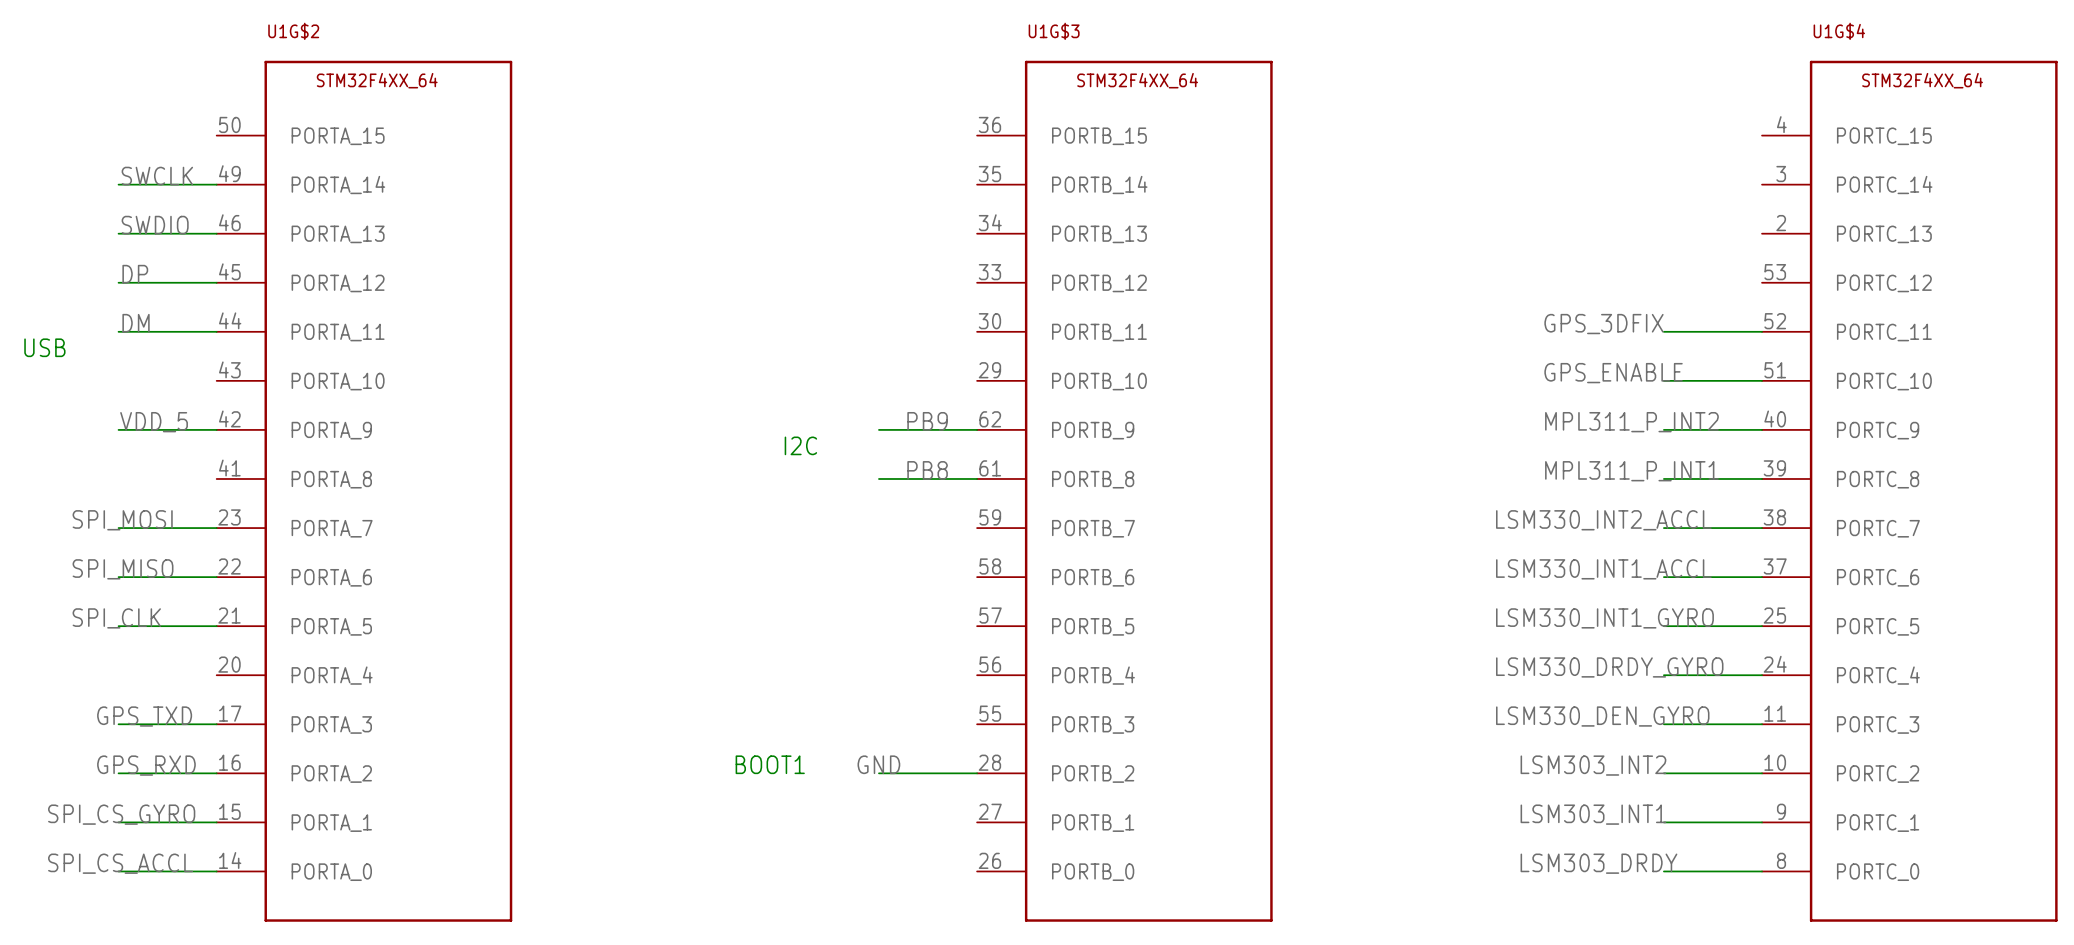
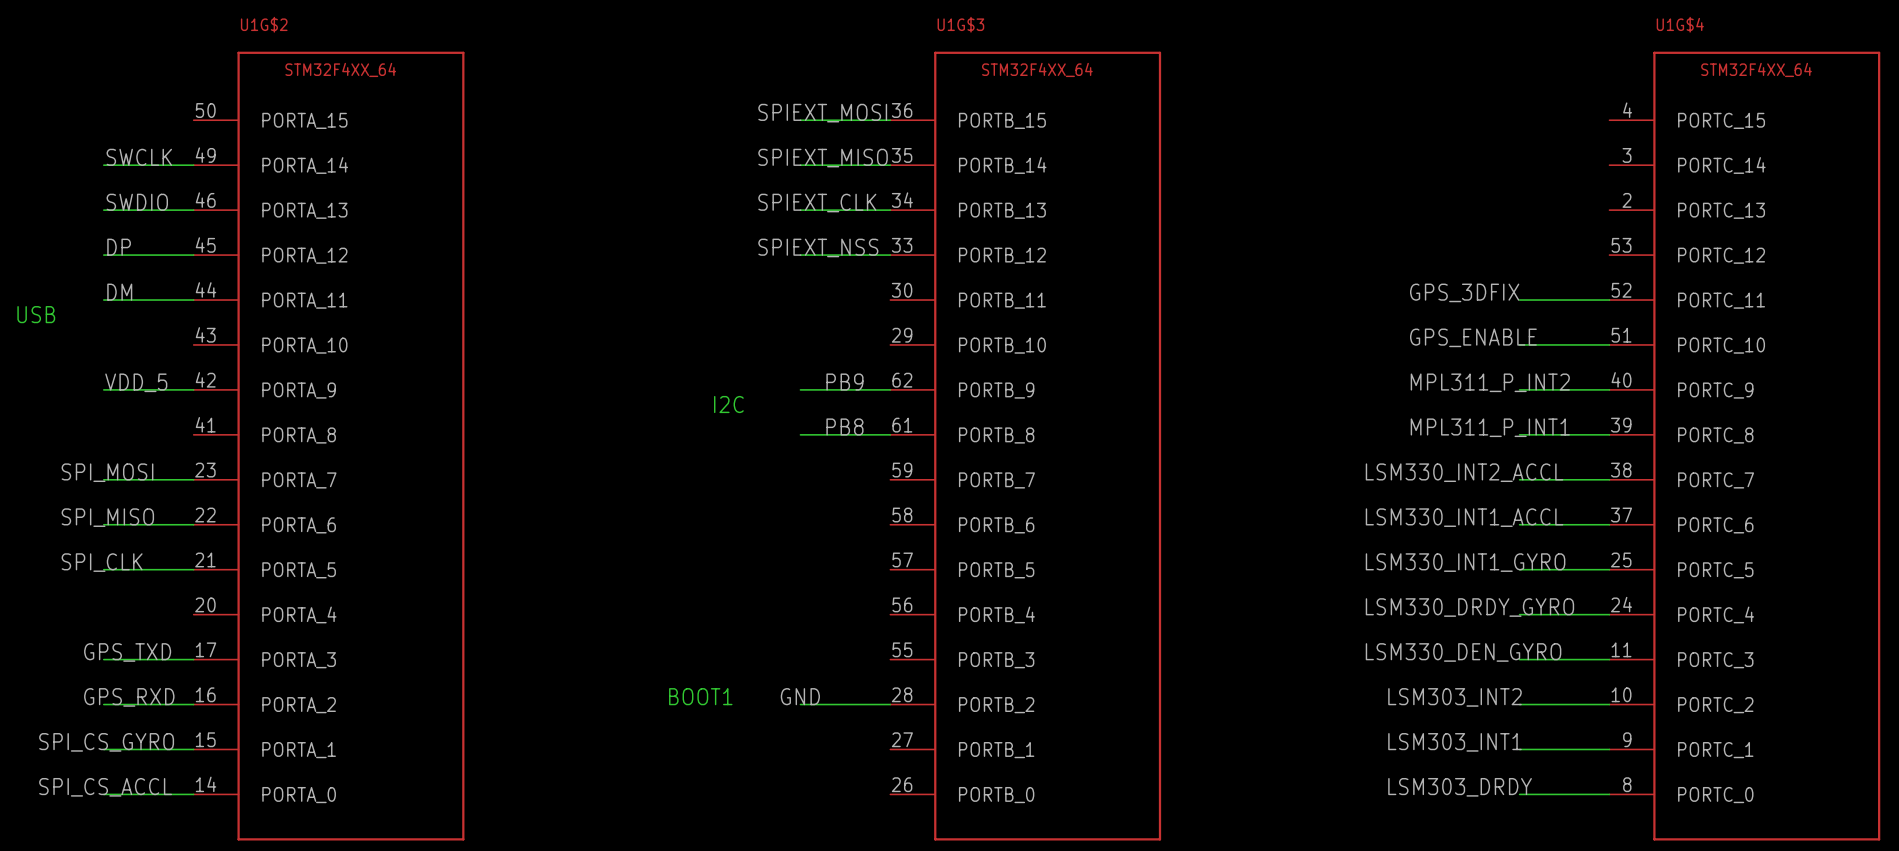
label: none -> SPIEXT_MOSI (822, 113)
wire: none -> (800, 120) (890, 120)
label: none -> SPIEXT_MISO (823, 158)
wire: none -> (800, 165) (890, 165)
label: none -> SPIEXT_CLK (817, 203)
wire: none -> (800, 210) (890, 210)
label: none -> SPIEXT_NSS (818, 247)
wire: none -> (800, 255) (890, 255)

